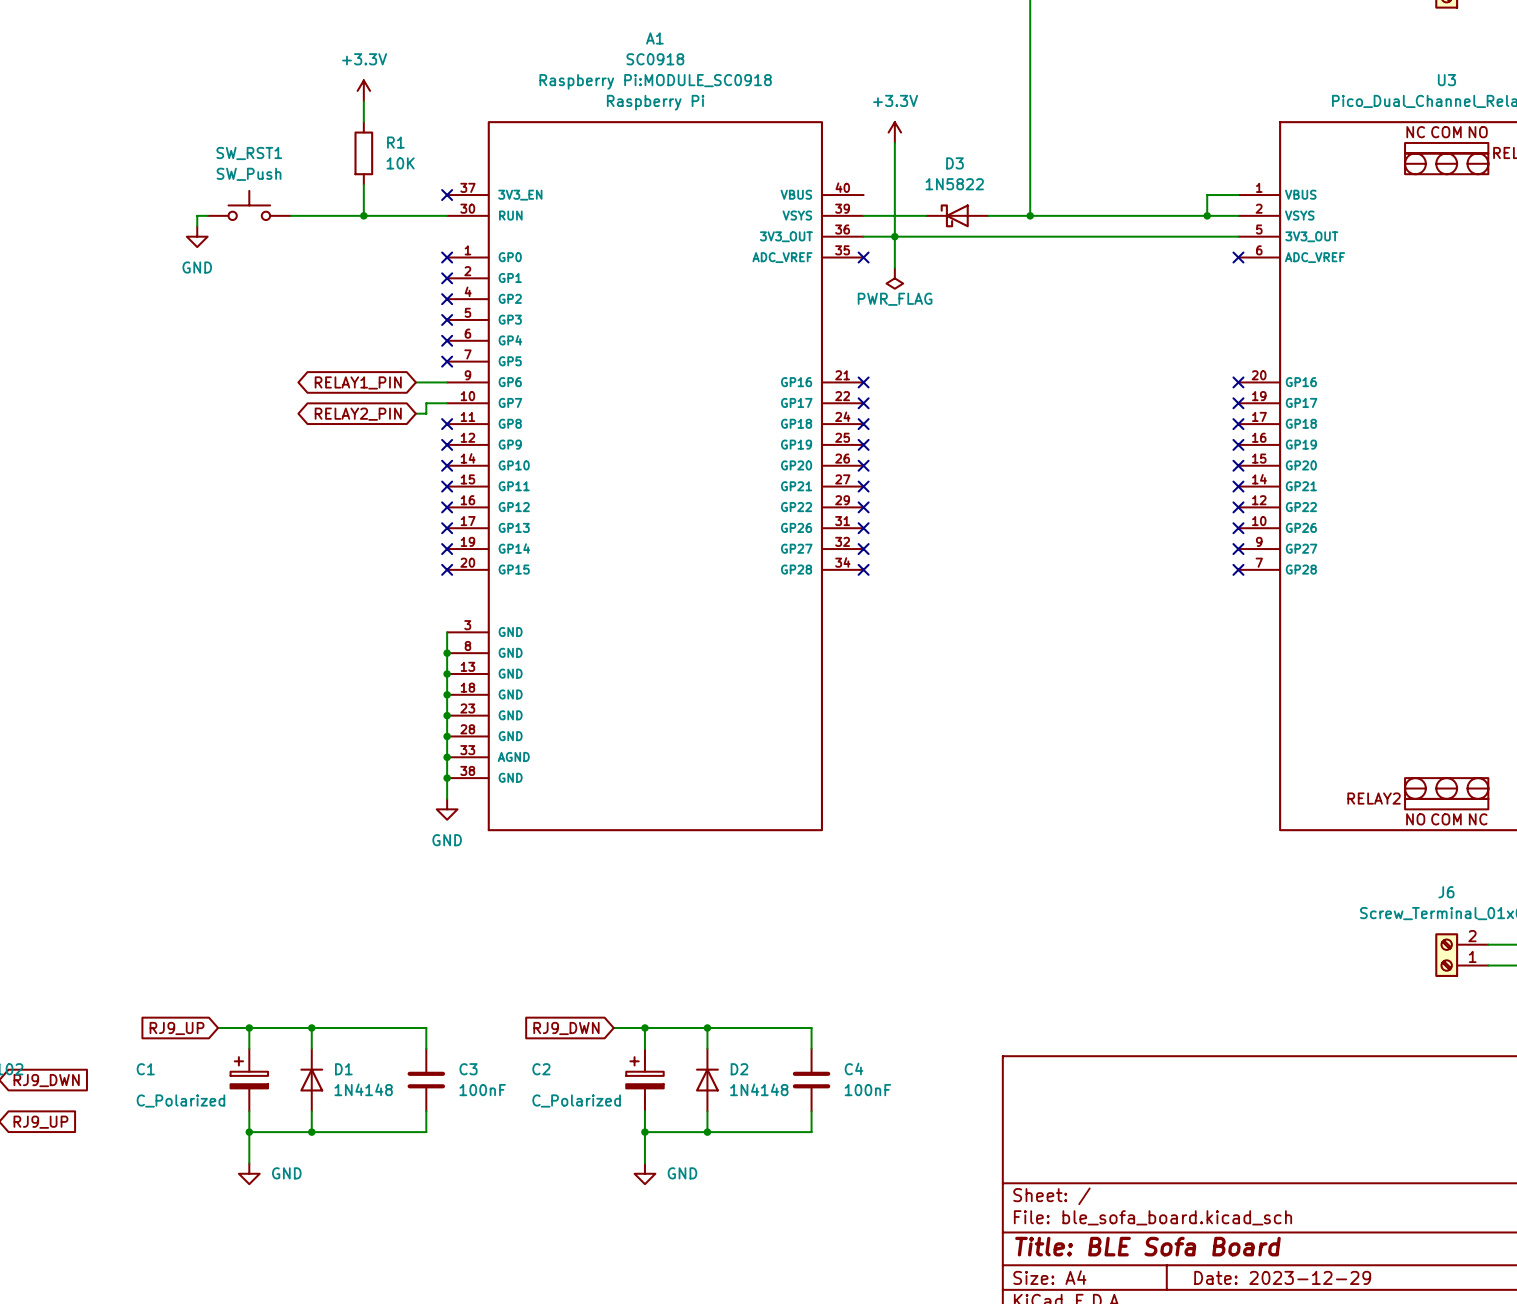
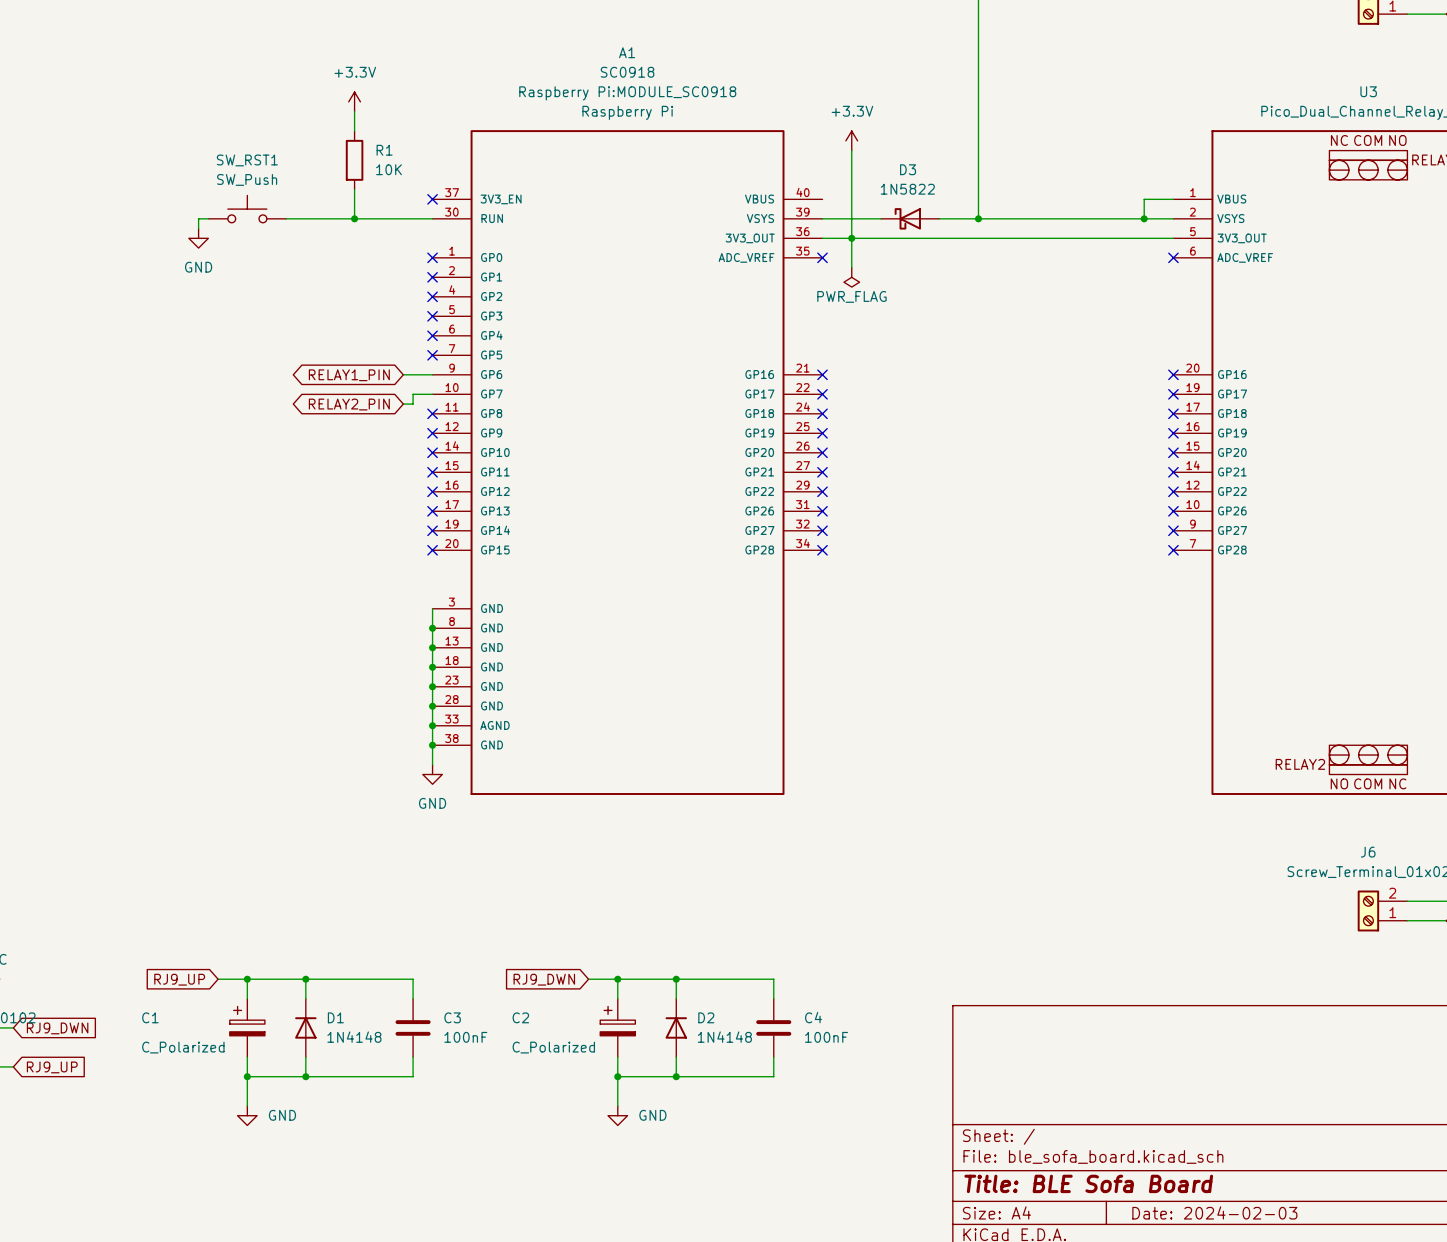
title block: Date: 2023-12-29 (1282, 1277) -> Date: 2024-02-03 (1214, 1212)

